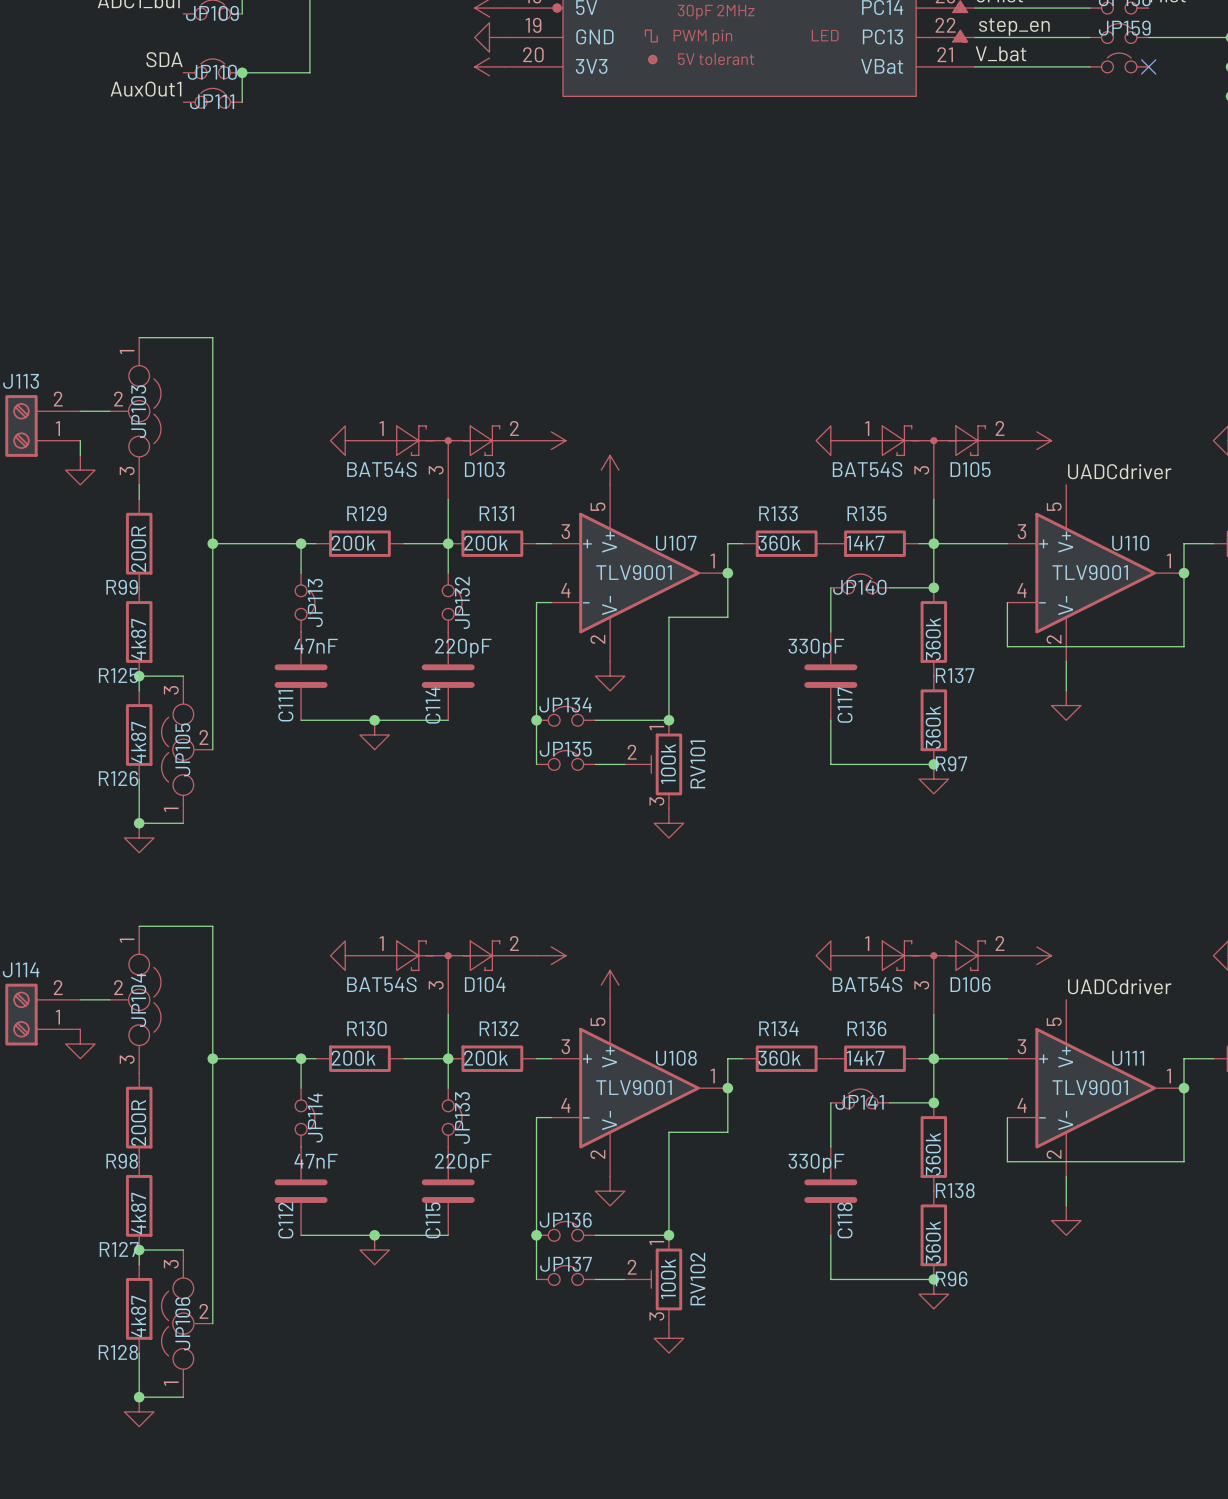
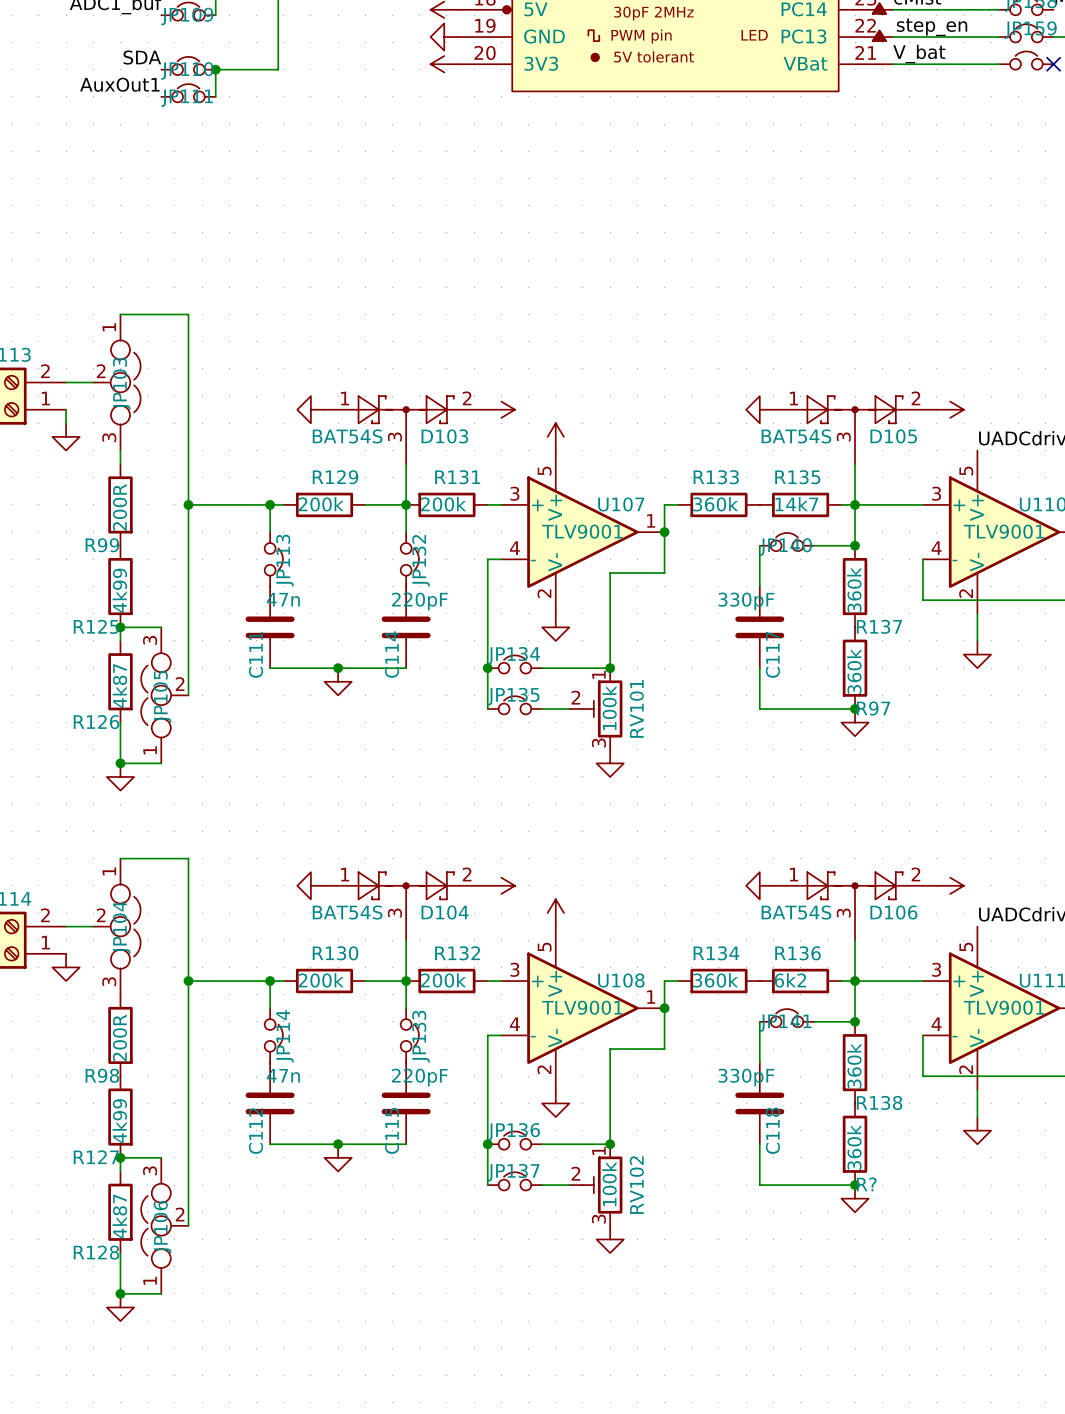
R125 value: 4k87 (138, 639) -> 4k99 (119, 590)
C111 value: 47nF (316, 646) -> 47n (283, 599)
R136 value: 14k7 (865, 1058) -> 6k2 (790, 980)
C112 value: 47nF (316, 1161) -> 47n (283, 1075)
R127 value: 4k87 (138, 1213) -> 4k99 (119, 1121)
R96 name: R96 (951, 1278) -> R? (866, 1184)

